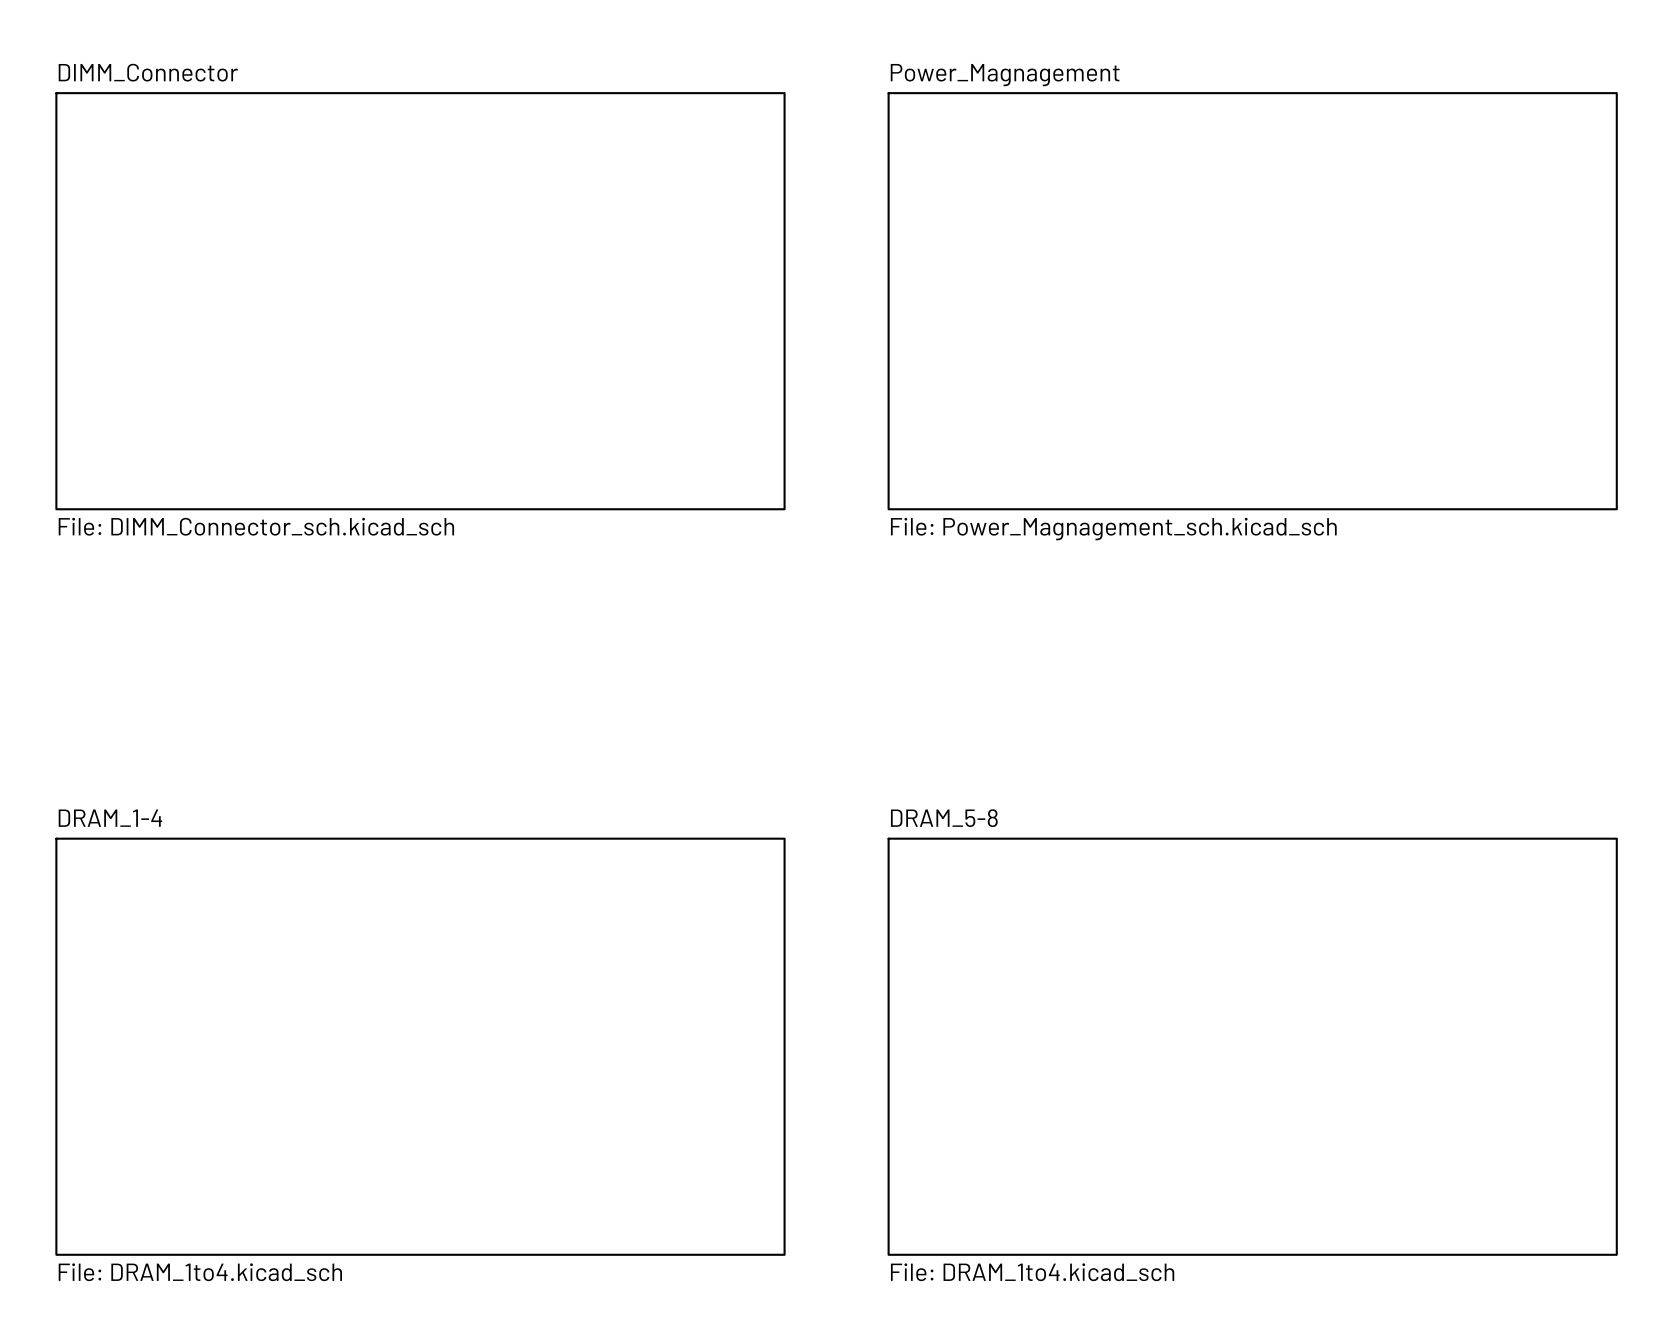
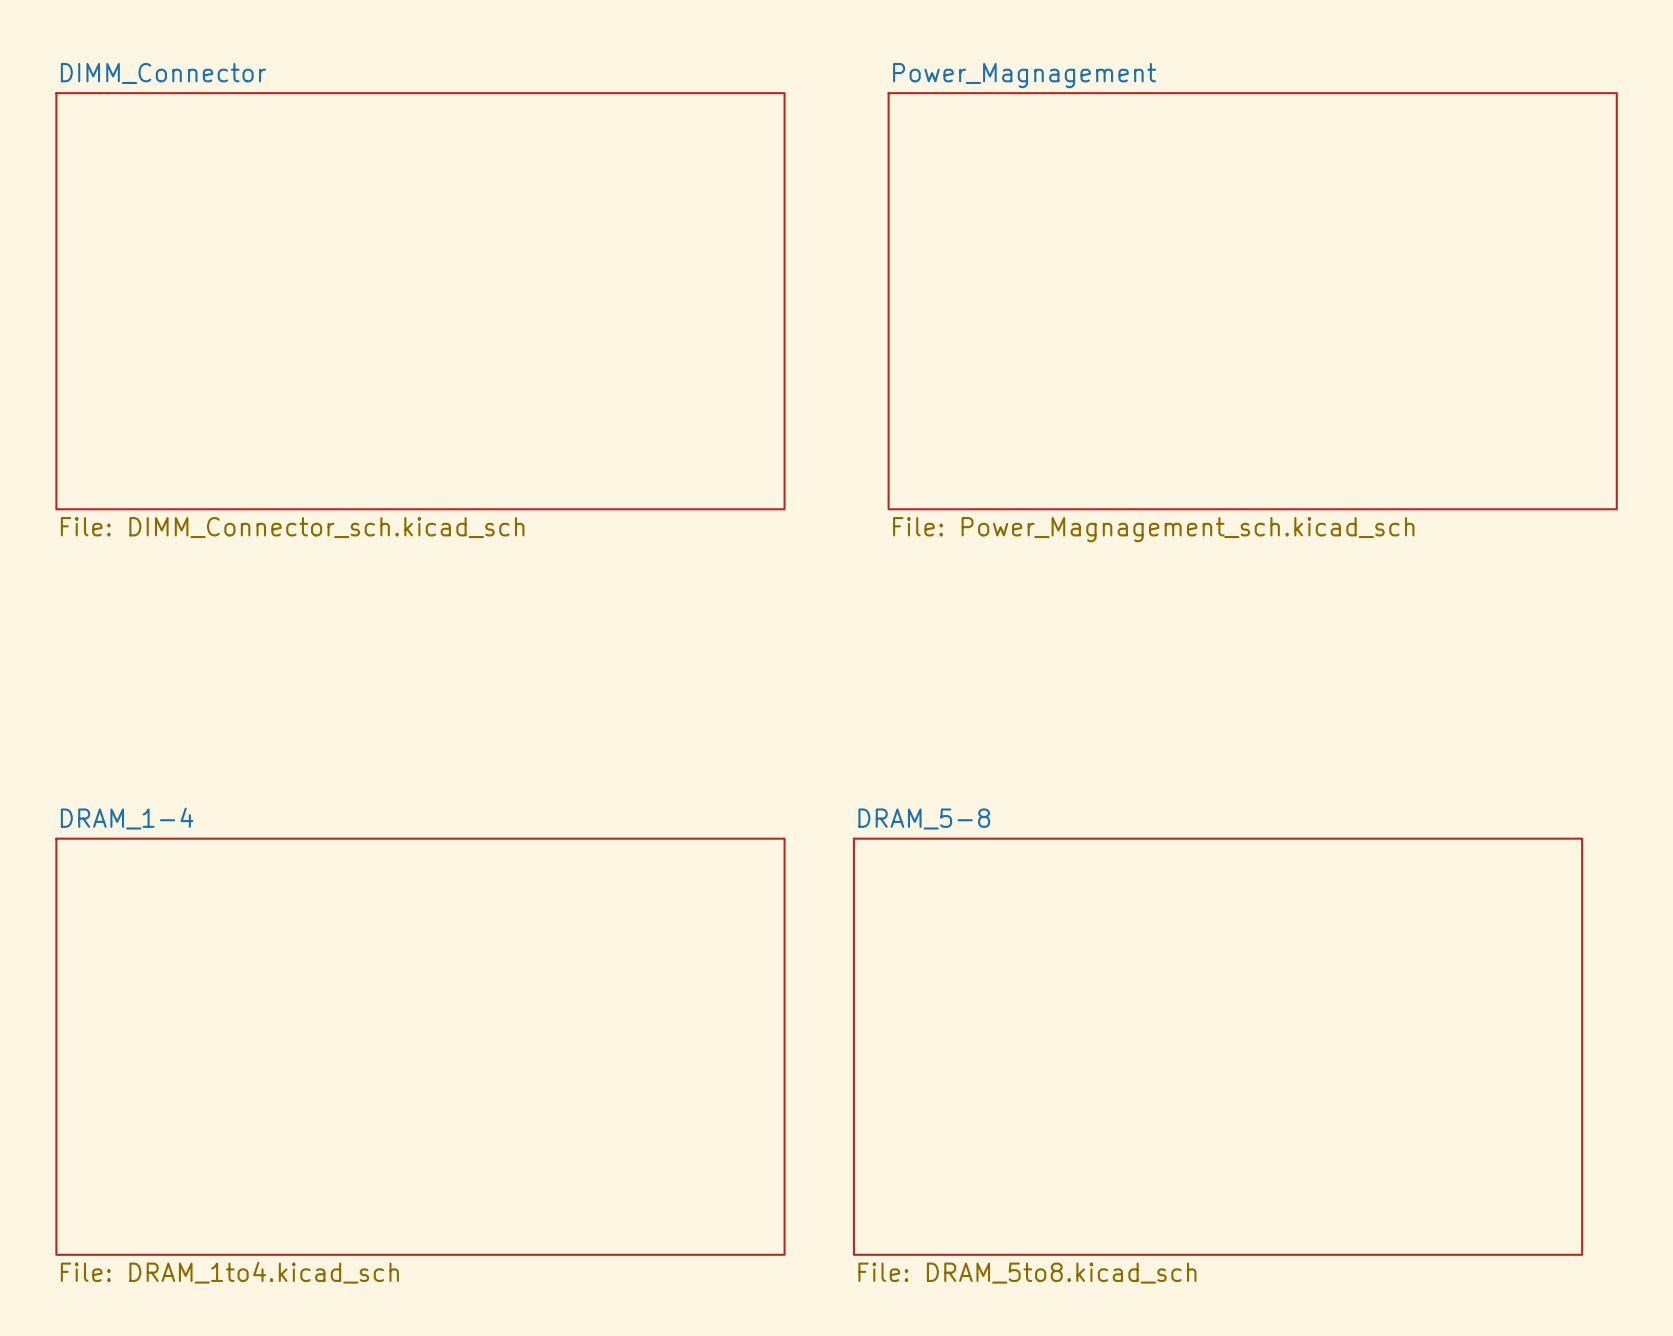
sheet DRAM_5-8 position: (1252, 1046) -> (1218, 1046)
sheet DRAM_5-8 value: File: DRAM_1to4.kicad_sch (1032, 1272) -> File: DRAM_5to8.kicad_sch (1027, 1273)

